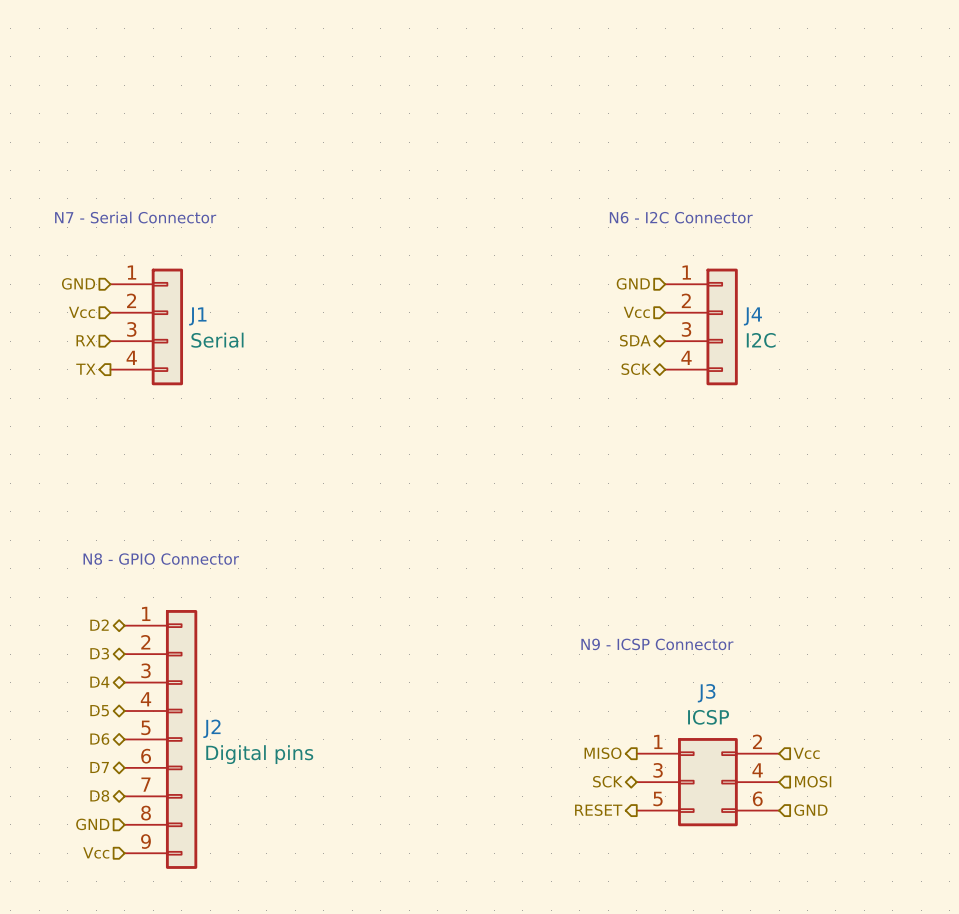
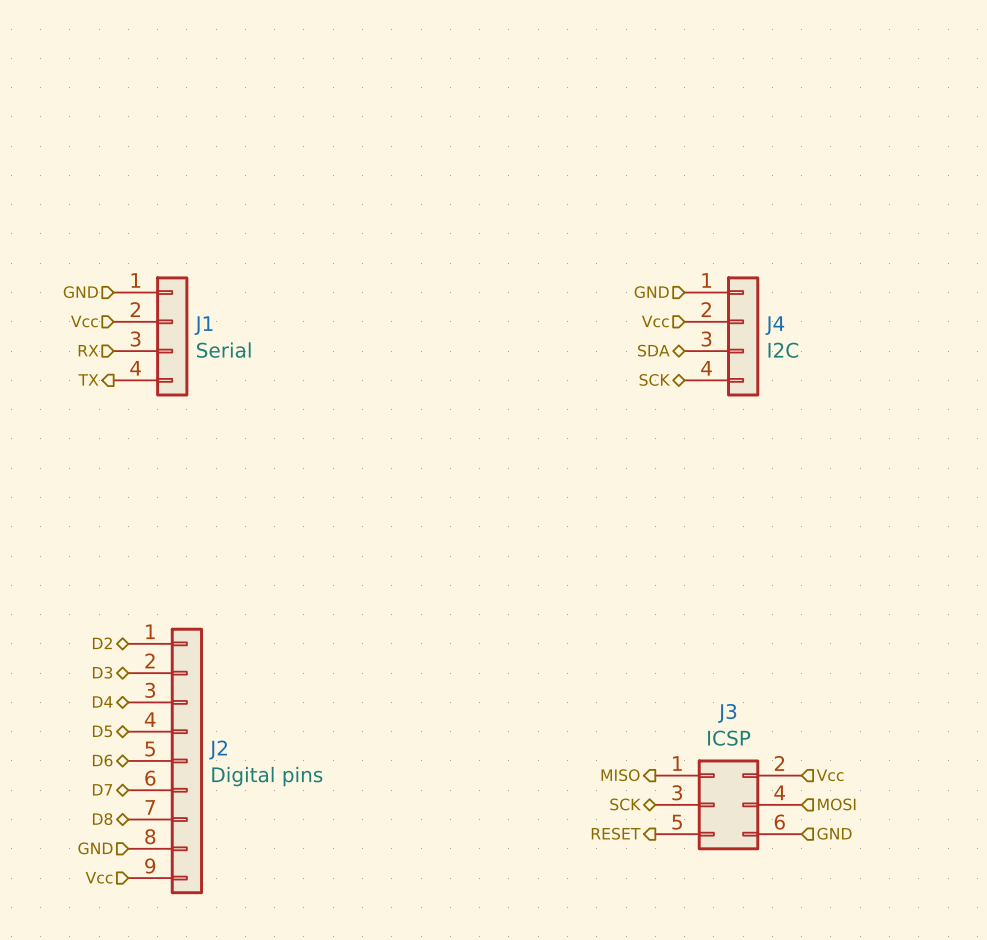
text: N7 - Serial Connector (135, 217) -> none
text: N6 - I2C Connector (681, 217) -> none
text: N8 - GPIO Connector (161, 559) -> none
text: N9 - ICSP Connector (657, 644) -> none

